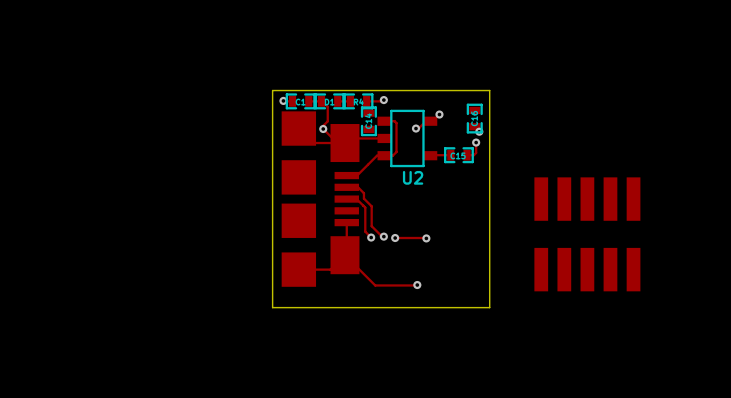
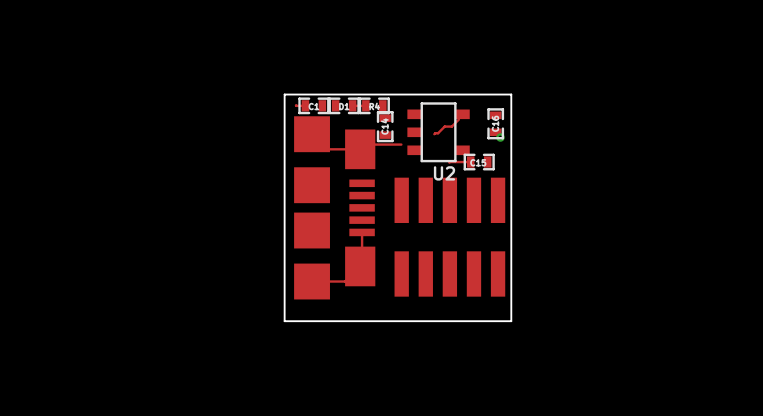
via: (283, 100) -> none
track: (383, 100) (366, 101) -> none
via: (383, 100) -> none
track: (308, 101) (322, 101) (327, 106) (327, 121) (323, 125) (323, 129) (337, 143) -> none
via: (439, 114) -> none
track: (384, 121) (394, 121) (396, 123) (396, 152) (392, 155) (377, 155) (357, 175) (346, 175) -> none
via: (415, 128) -> none
via: (323, 129) -> none
U2 position: (407, 138) -> (438, 132)
track: (476, 142) (476, 152) (473, 155) (467, 155) -> none
via: (476, 142) -> none
track: (346, 187) (358, 187) (363, 193) (363, 198) (371, 206) (371, 226) (383, 236) -> none
track: (346, 199) (356, 199) (365, 207) (365, 231) (371, 237) -> none
part position: (587, 234) -> (449, 237)
via: (383, 236) -> none
via: (371, 237) -> none
track: (395, 238) (426, 238) -> none
via: (395, 238) -> none
via: (426, 238) -> none
track: (344, 255) (375, 285) (417, 285) -> none
via: (417, 285) -> none

